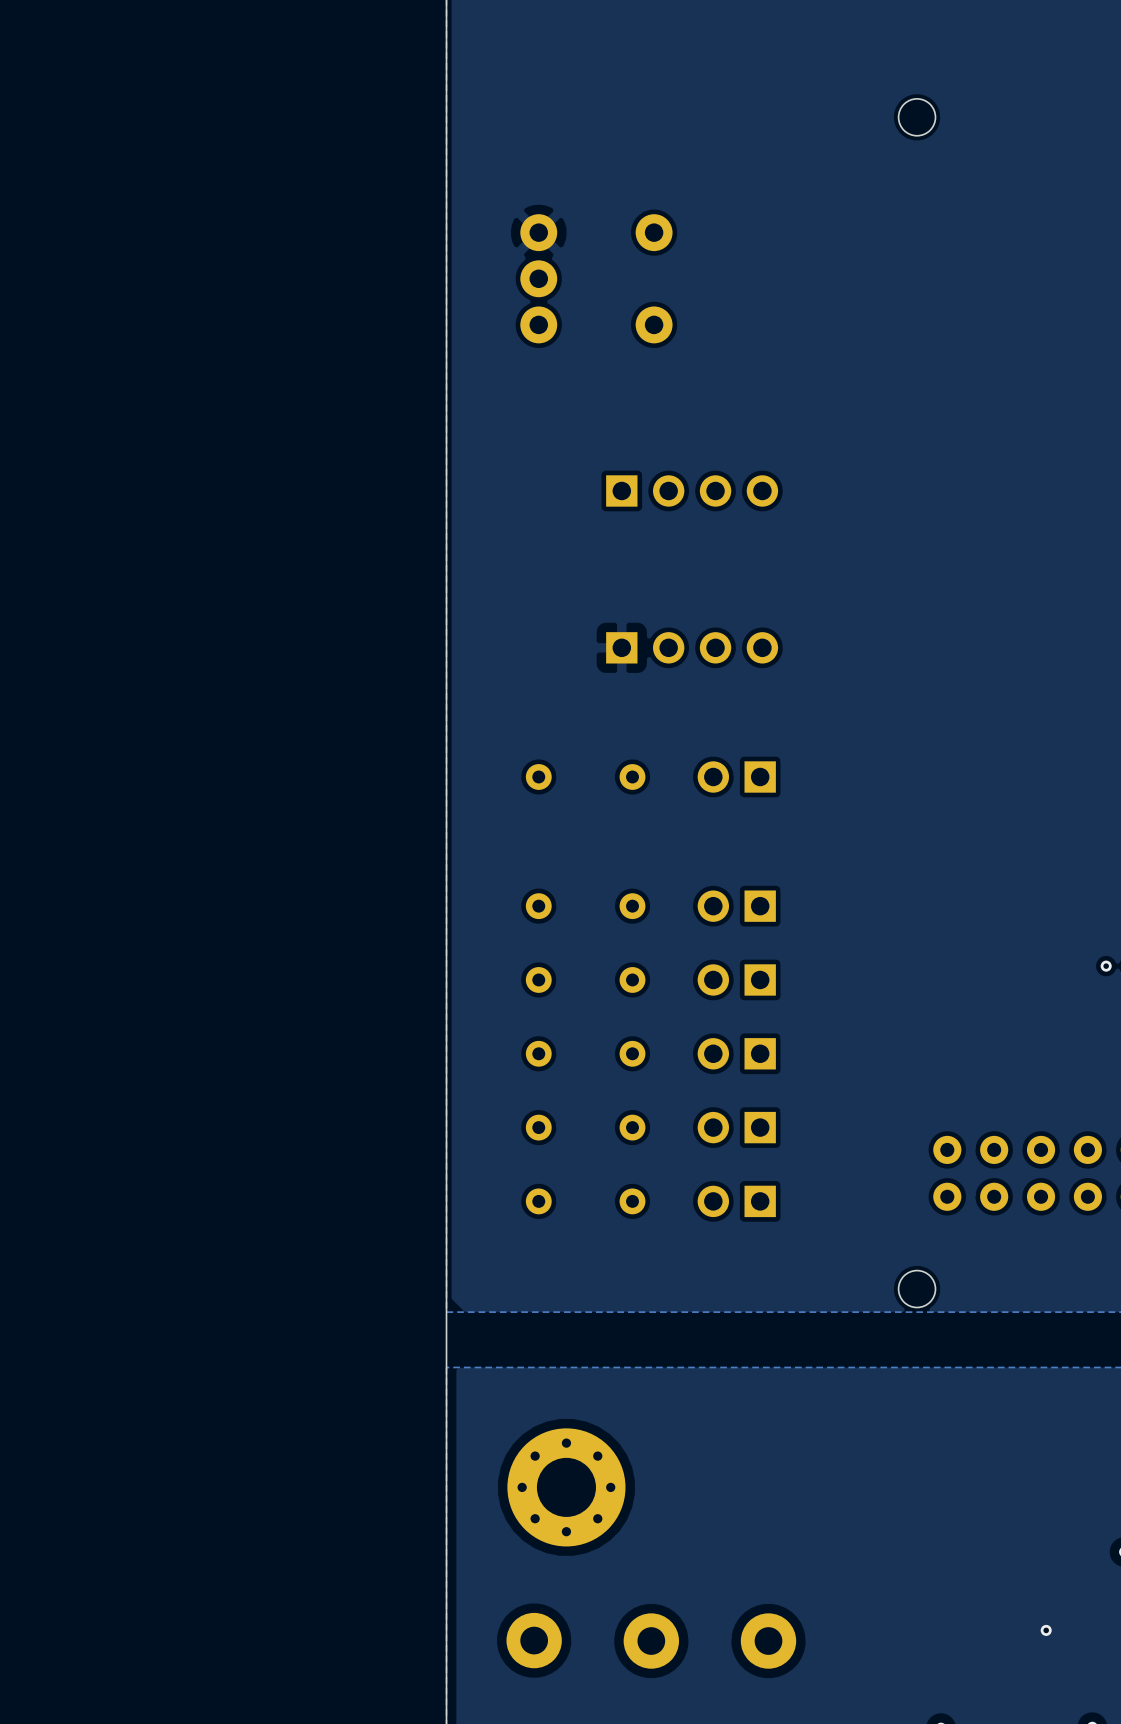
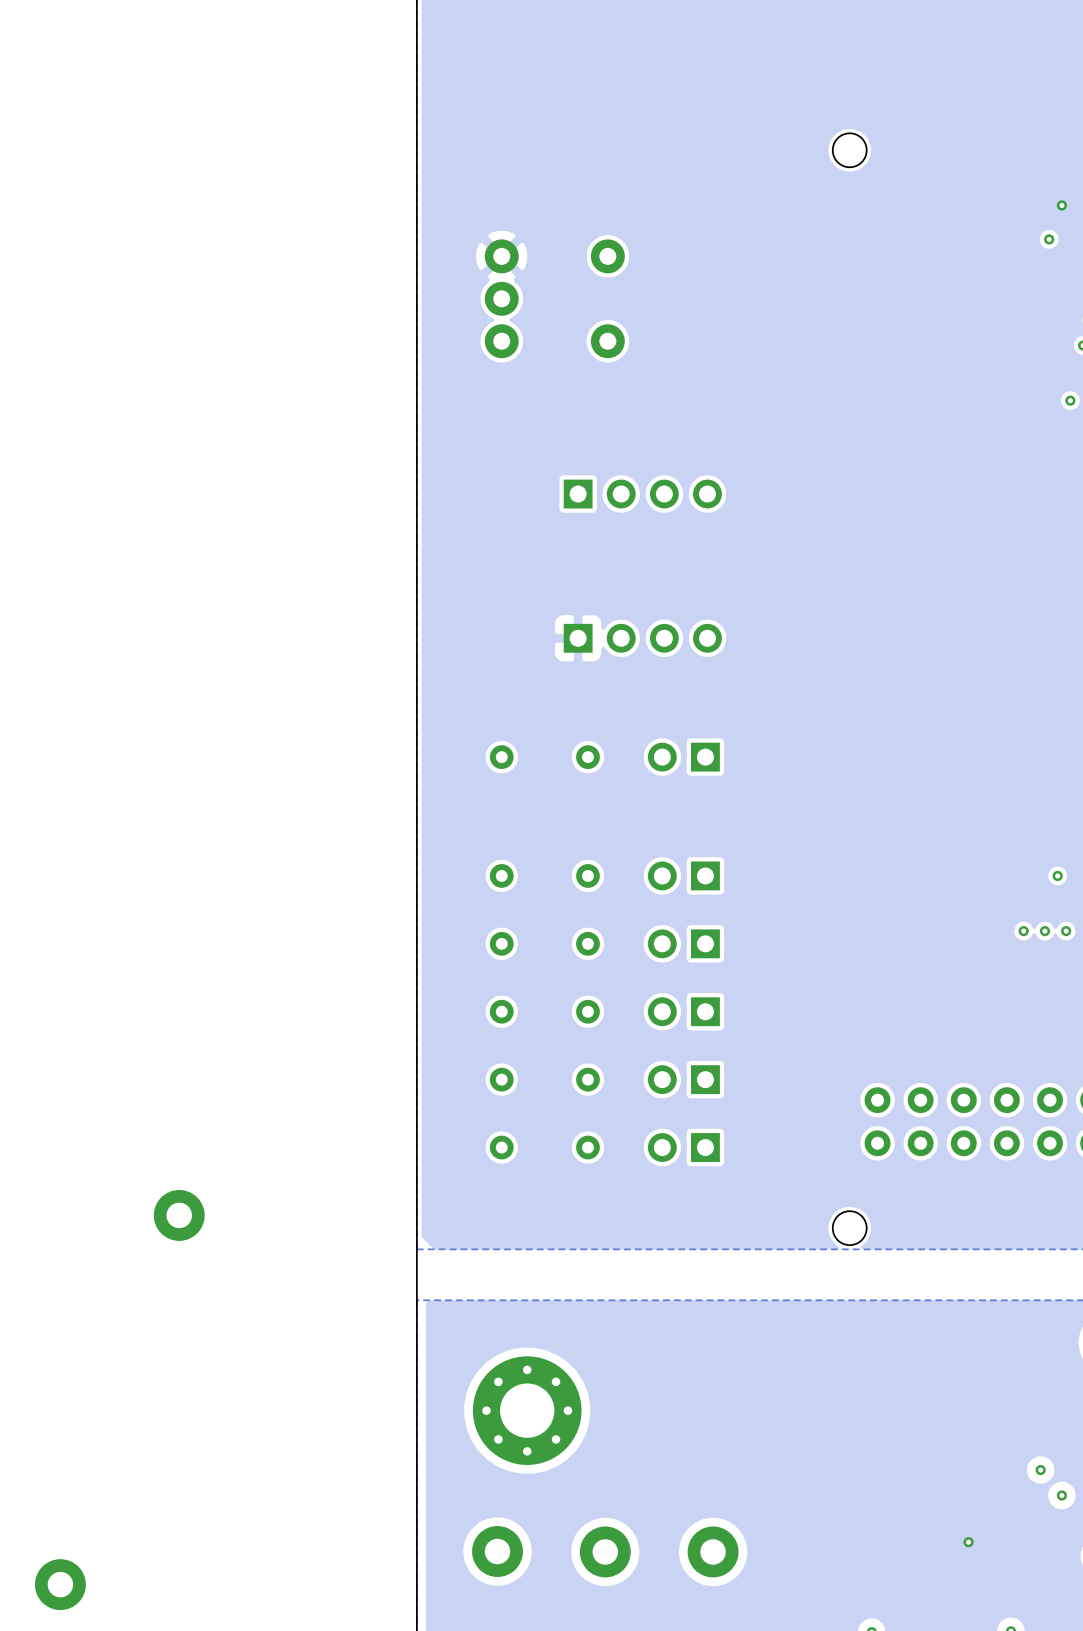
part: none -> (179, 1215)
part: none -> (60, 1584)

